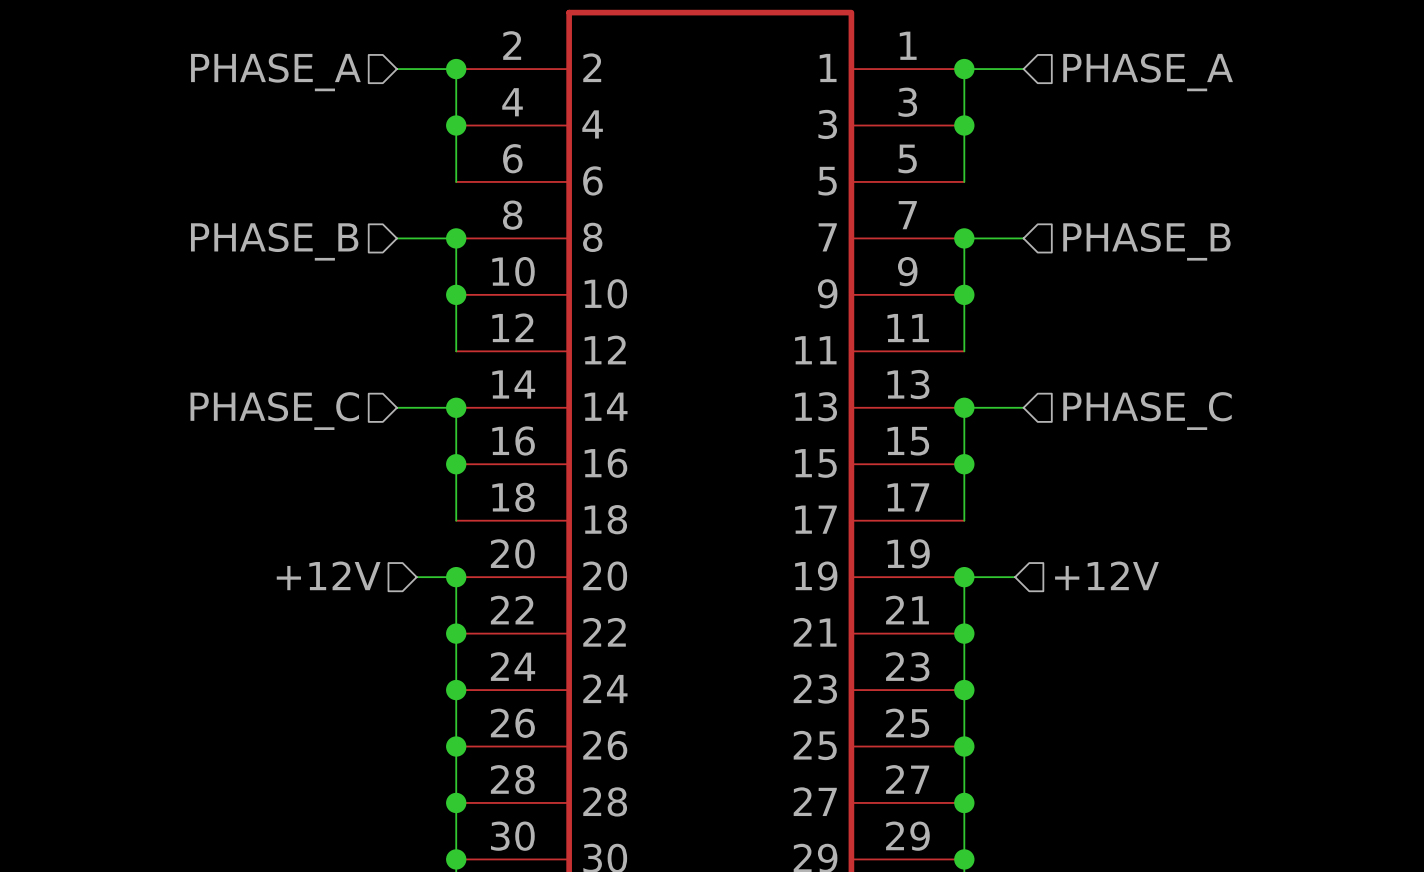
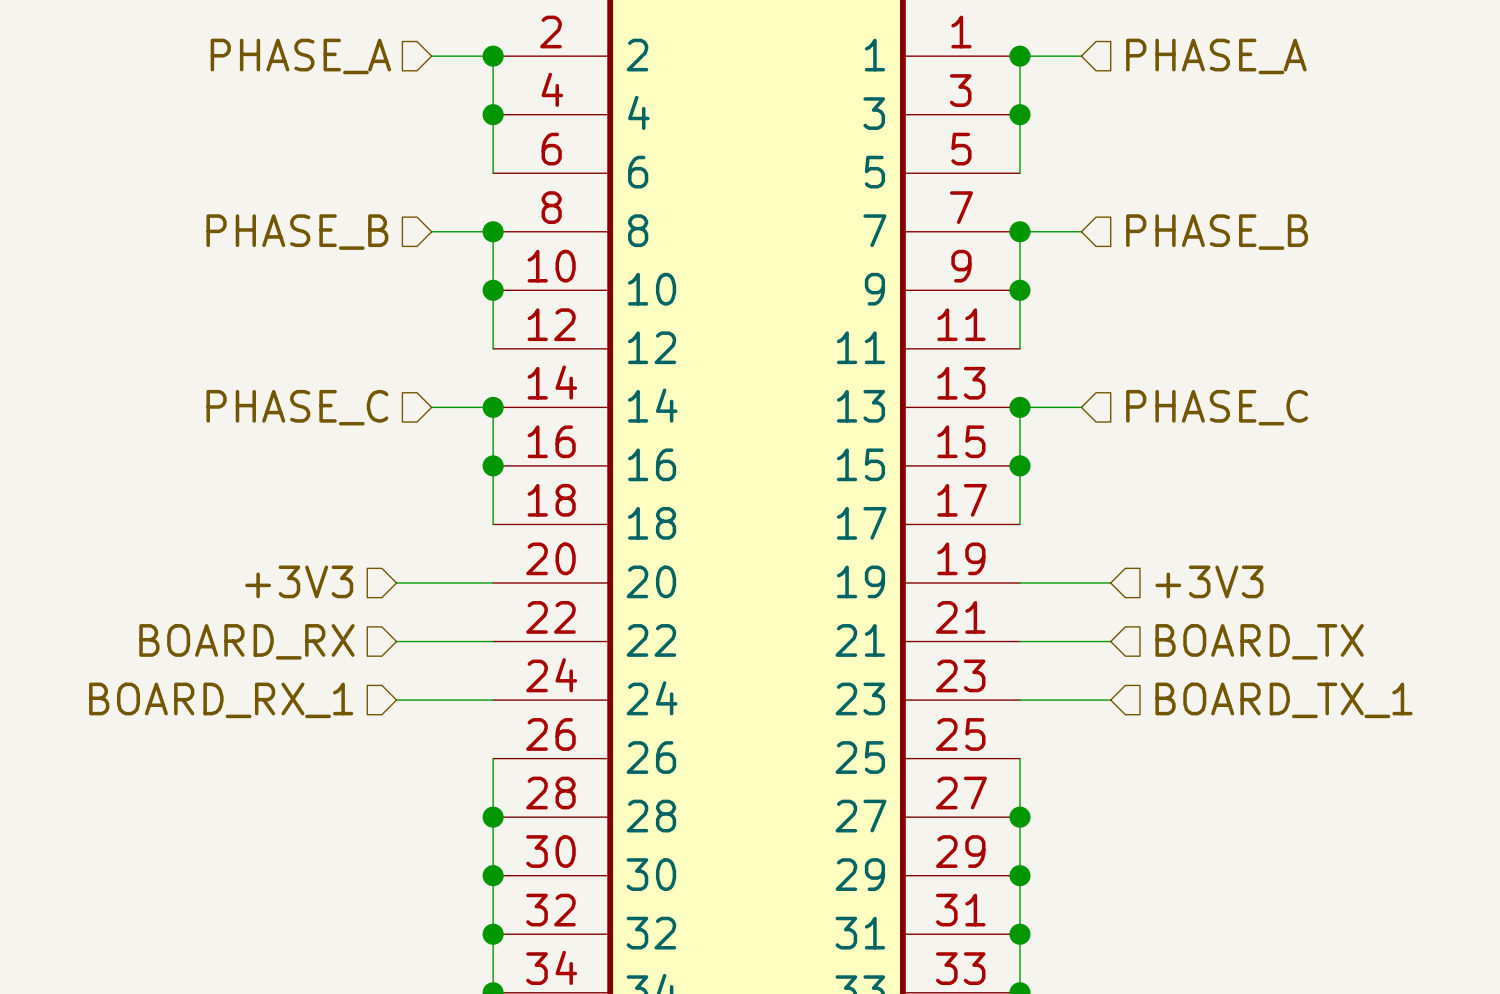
hierarchical label: +12V (328, 575) -> none
hierarchical label: +12V (1106, 575) -> none
hierarchical label: none -> +3V3 (299, 581)
hierarchical label: none -> +3V3 (1209, 581)
wire: none -> (396, 582) (452, 582)
wire: (456, 577) (456, 746) -> none
junction: (456, 577) -> none
wire: (964, 577) (964, 746) -> none
junction: (964, 577) -> none
wire: none -> (1072, 582) (1110, 582)
wire: none -> (396, 641) (493, 641)
junction: (456, 633) -> none
wire: none -> (1019, 641) (1110, 641)
junction: (964, 633) -> none
hierarchical label: none -> BOARD_RX (246, 641)
hierarchical label: none -> BOARD_TX (1259, 641)
wire: none -> (396, 700) (493, 700)
junction: (456, 690) -> none
wire: none -> (1019, 700) (1110, 700)
junction: (964, 690) -> none
hierarchical label: none -> BOARD_RX_1 (221, 700)
hierarchical label: none -> BOARD_TX_1 (1283, 700)
junction: (456, 746) -> none
junction: (964, 746) -> none

